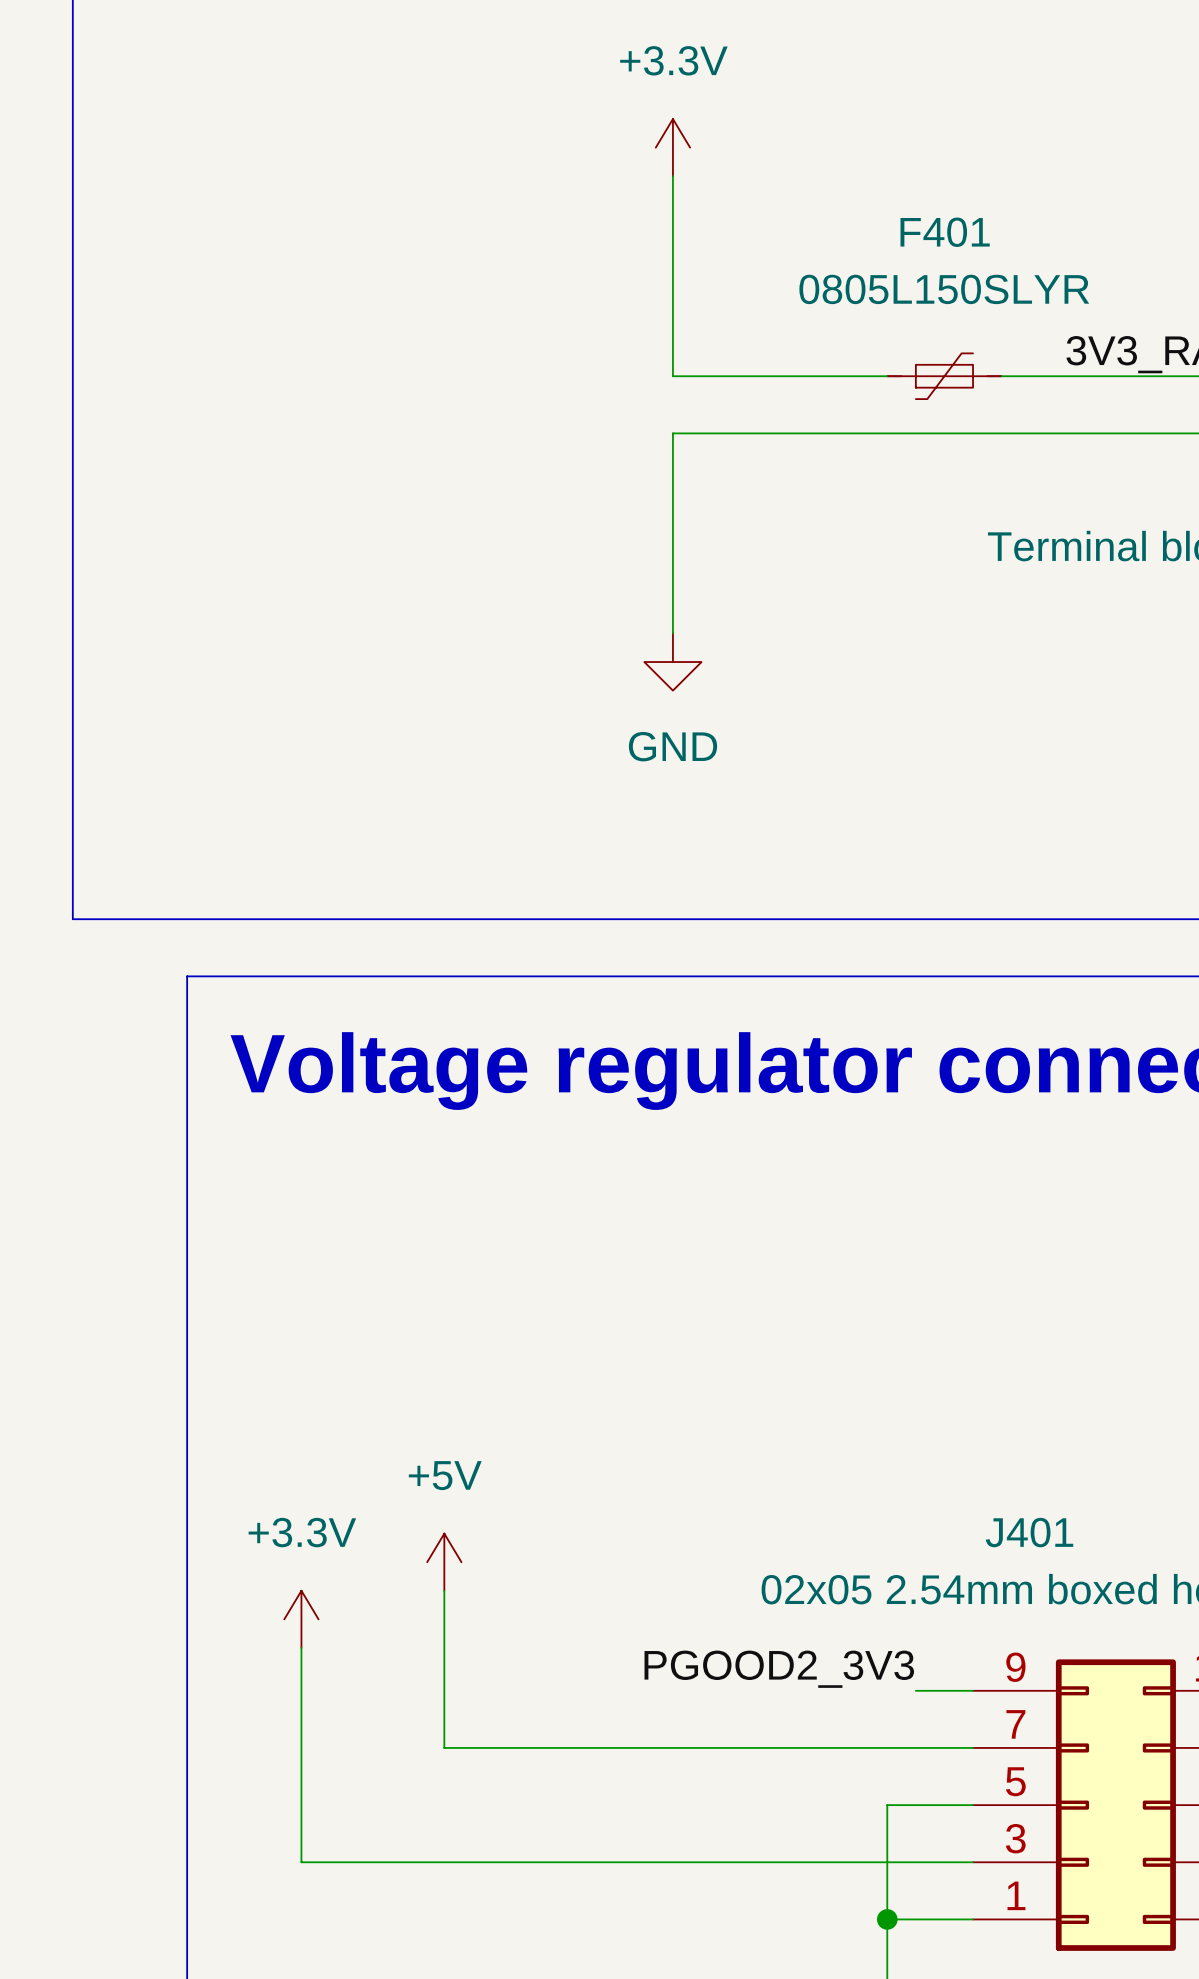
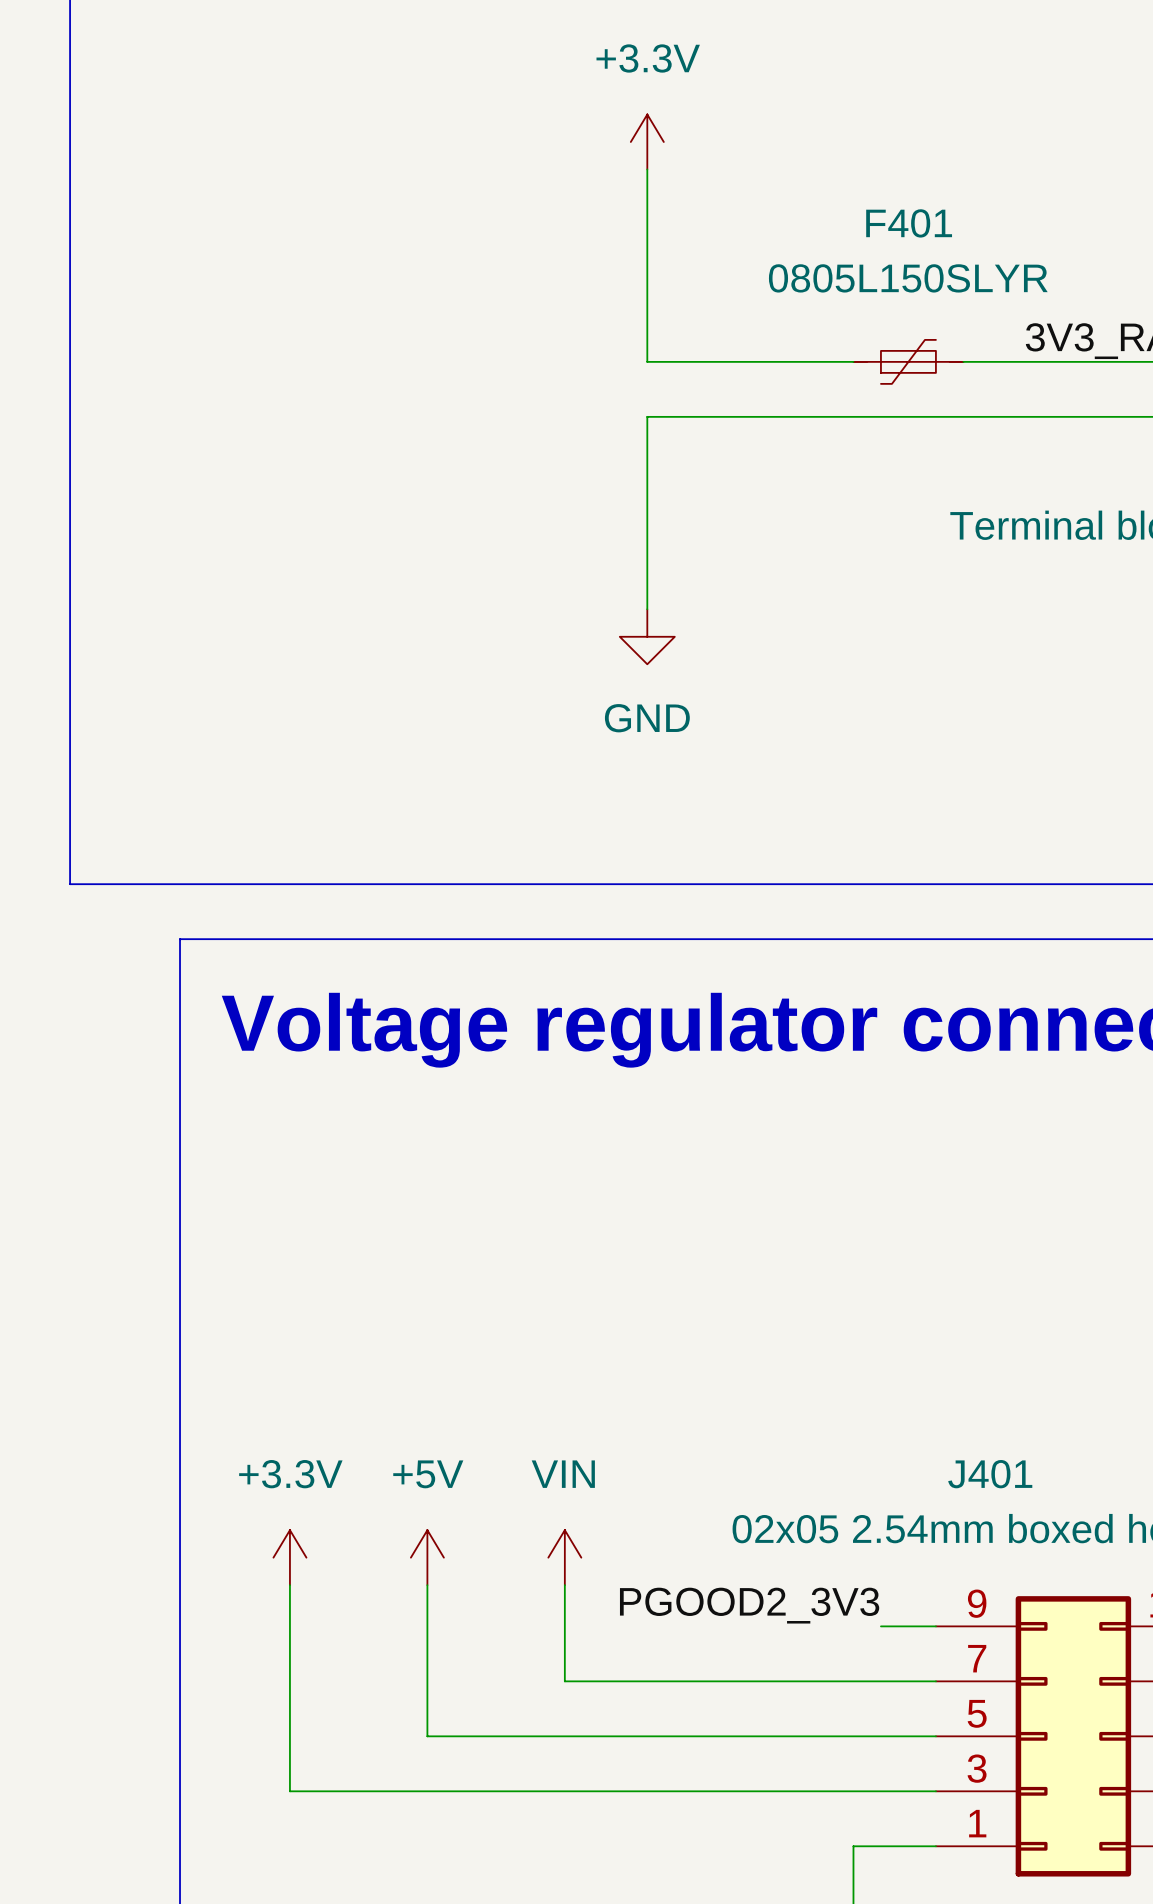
power symbol position: +5V (444, 1562) -> +5V (427, 1557)
power symbol: none -> VIN (564, 1557)
wire: (444, 1747) (587, 1747) -> (564, 1585) (564, 1681)
wire: (887, 1805) (887, 1919) -> (853, 1736) (427, 1736) (427, 1681)
junction: (887, 1919) -> none

